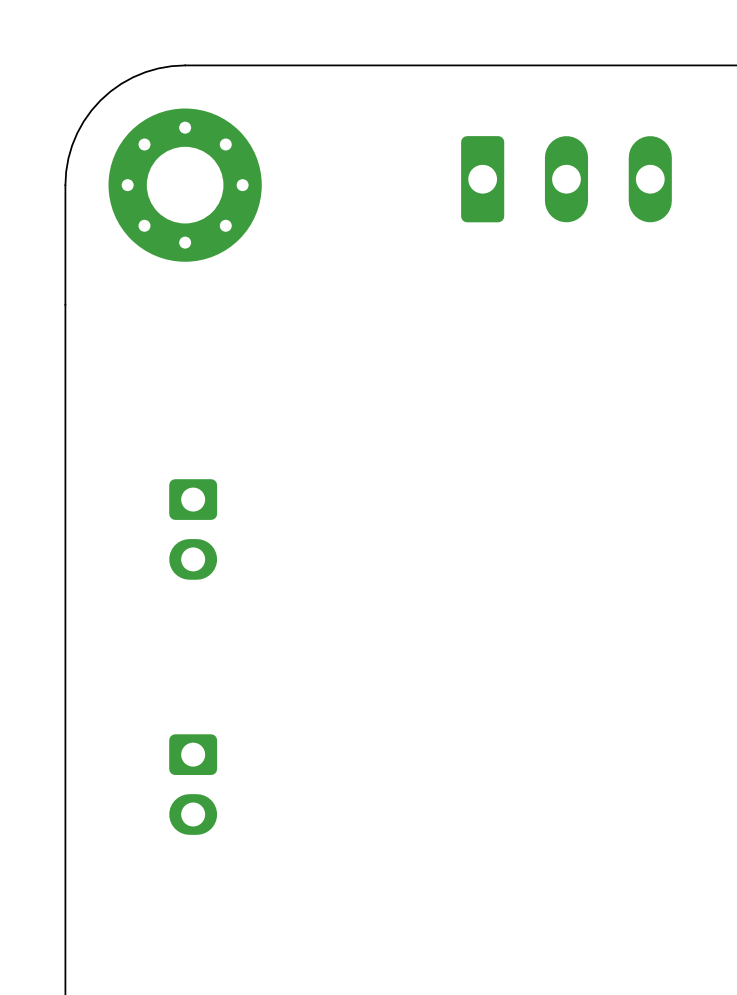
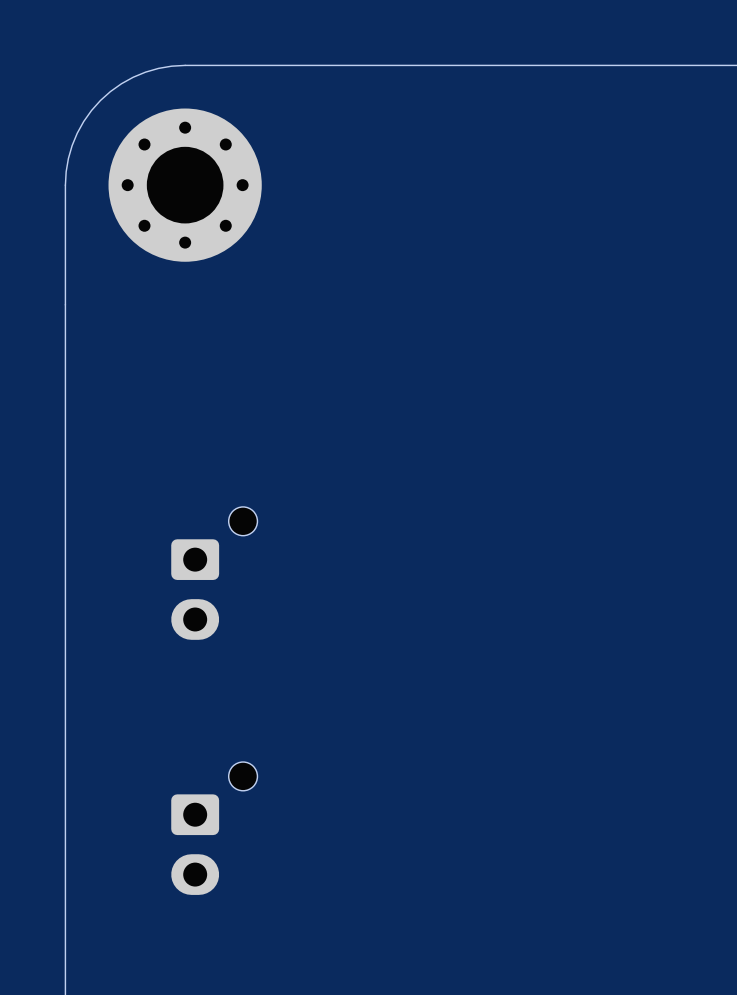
part: (566, 179) -> none
part: (193, 529) -> none
part: none -> (214, 573)
part: (193, 784) -> none
part: none -> (214, 828)

